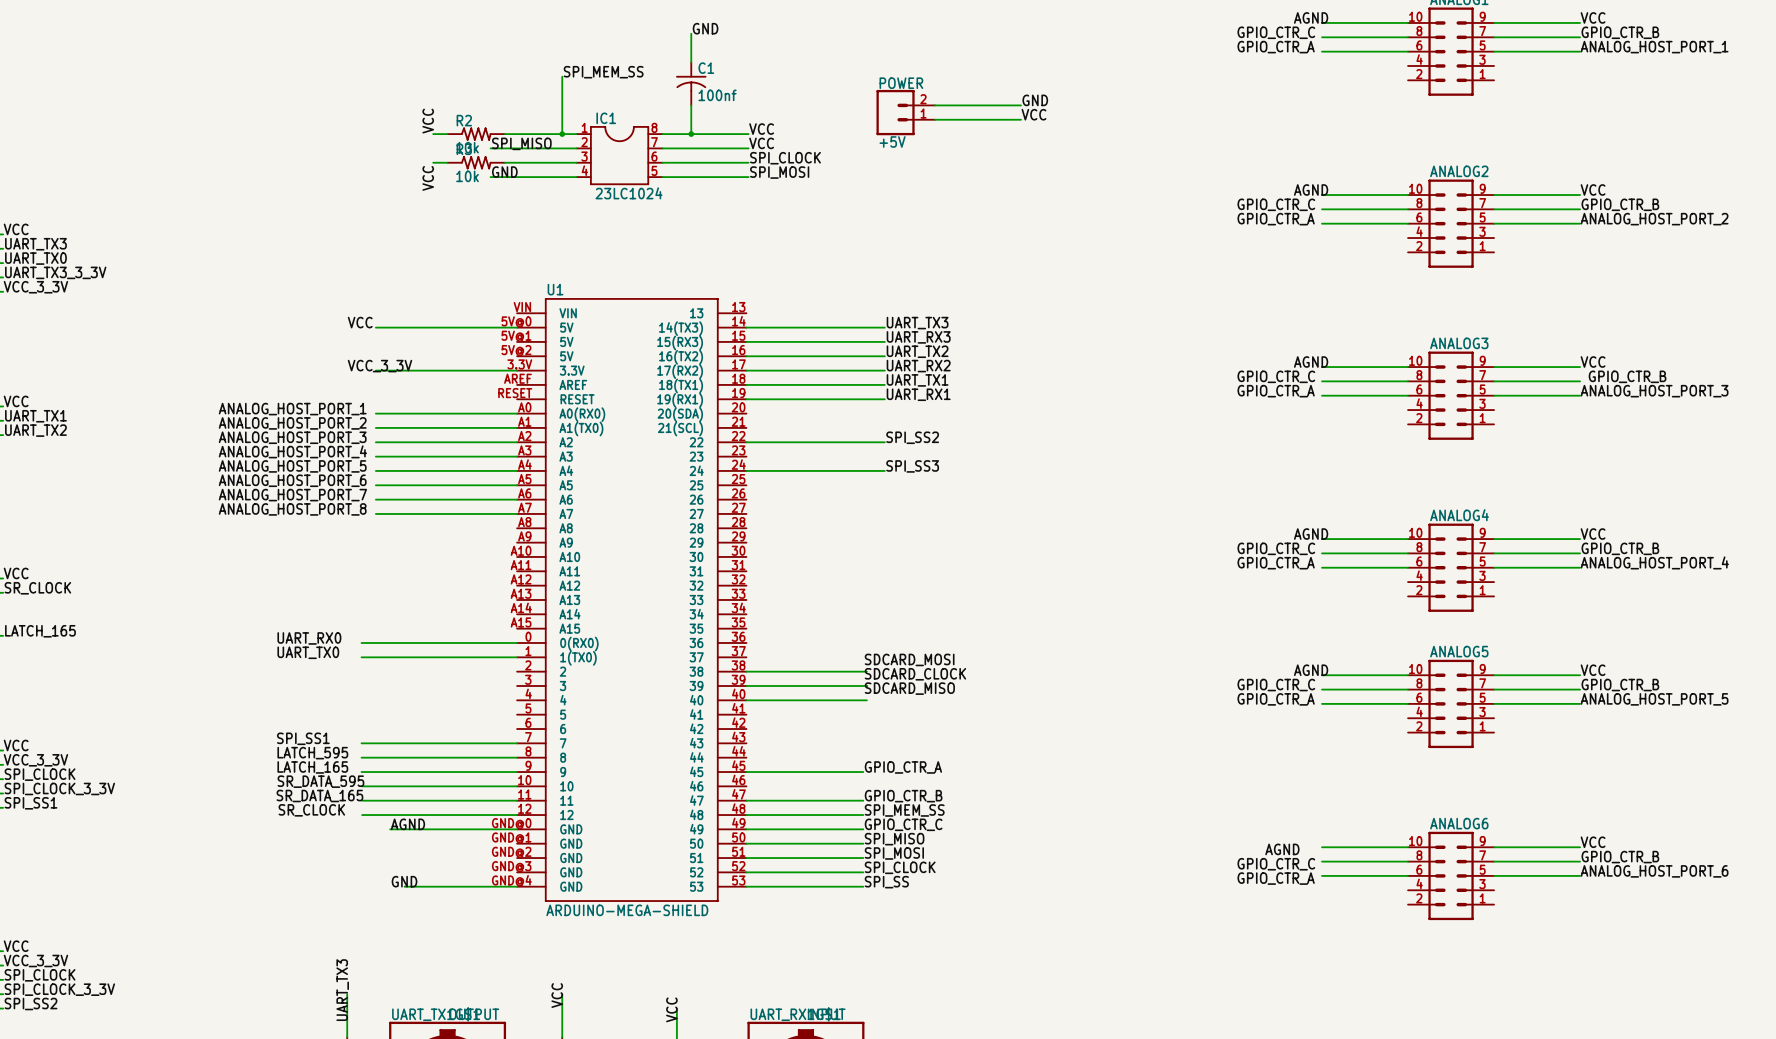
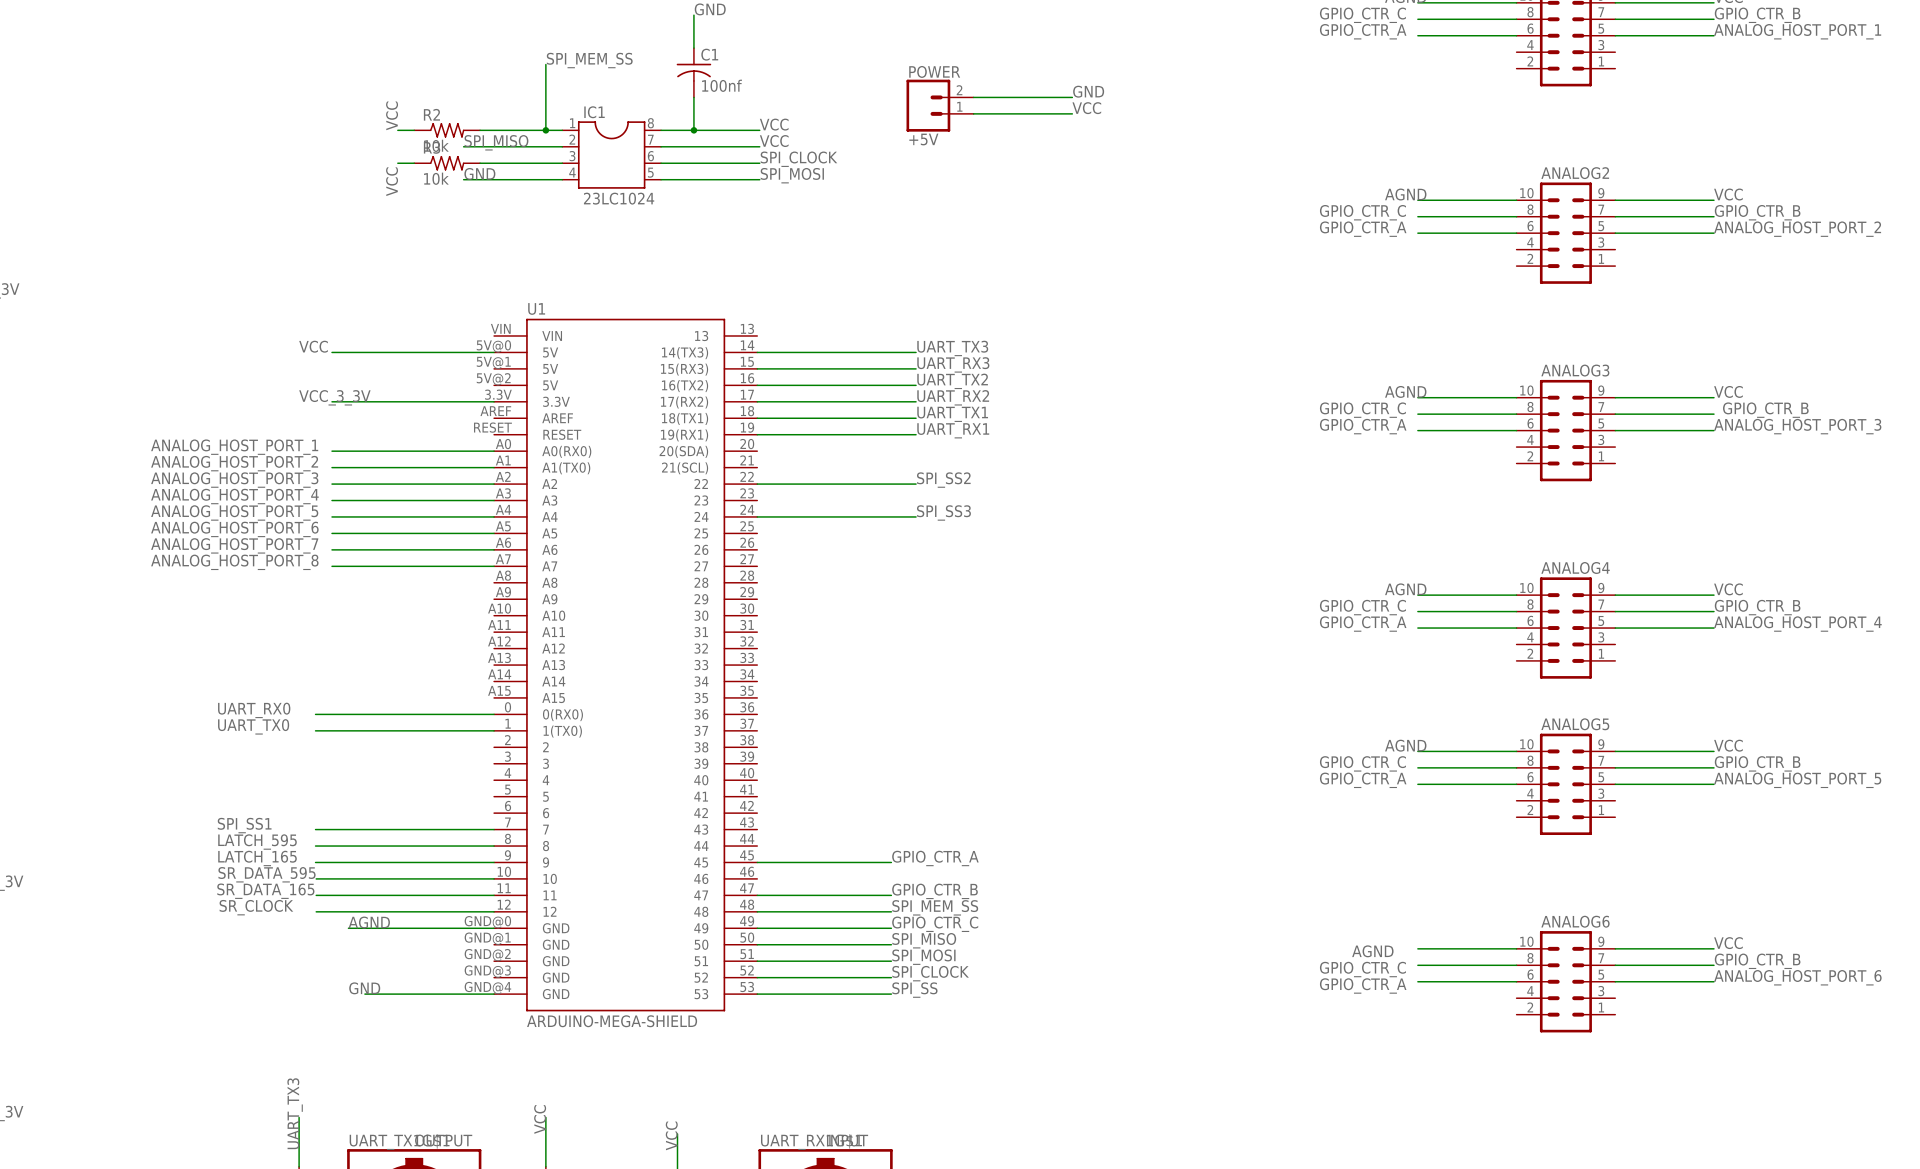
label: SDCARD_MOSI (909, 659) -> none
wire: (746, 671) (866, 671) -> none
label: SDCARD_CLOCK (915, 674) -> none
wire: (746, 686) (866, 686) -> none
label: SDCARD_MISO (909, 688) -> none
wire: (746, 700) (866, 700) -> none

